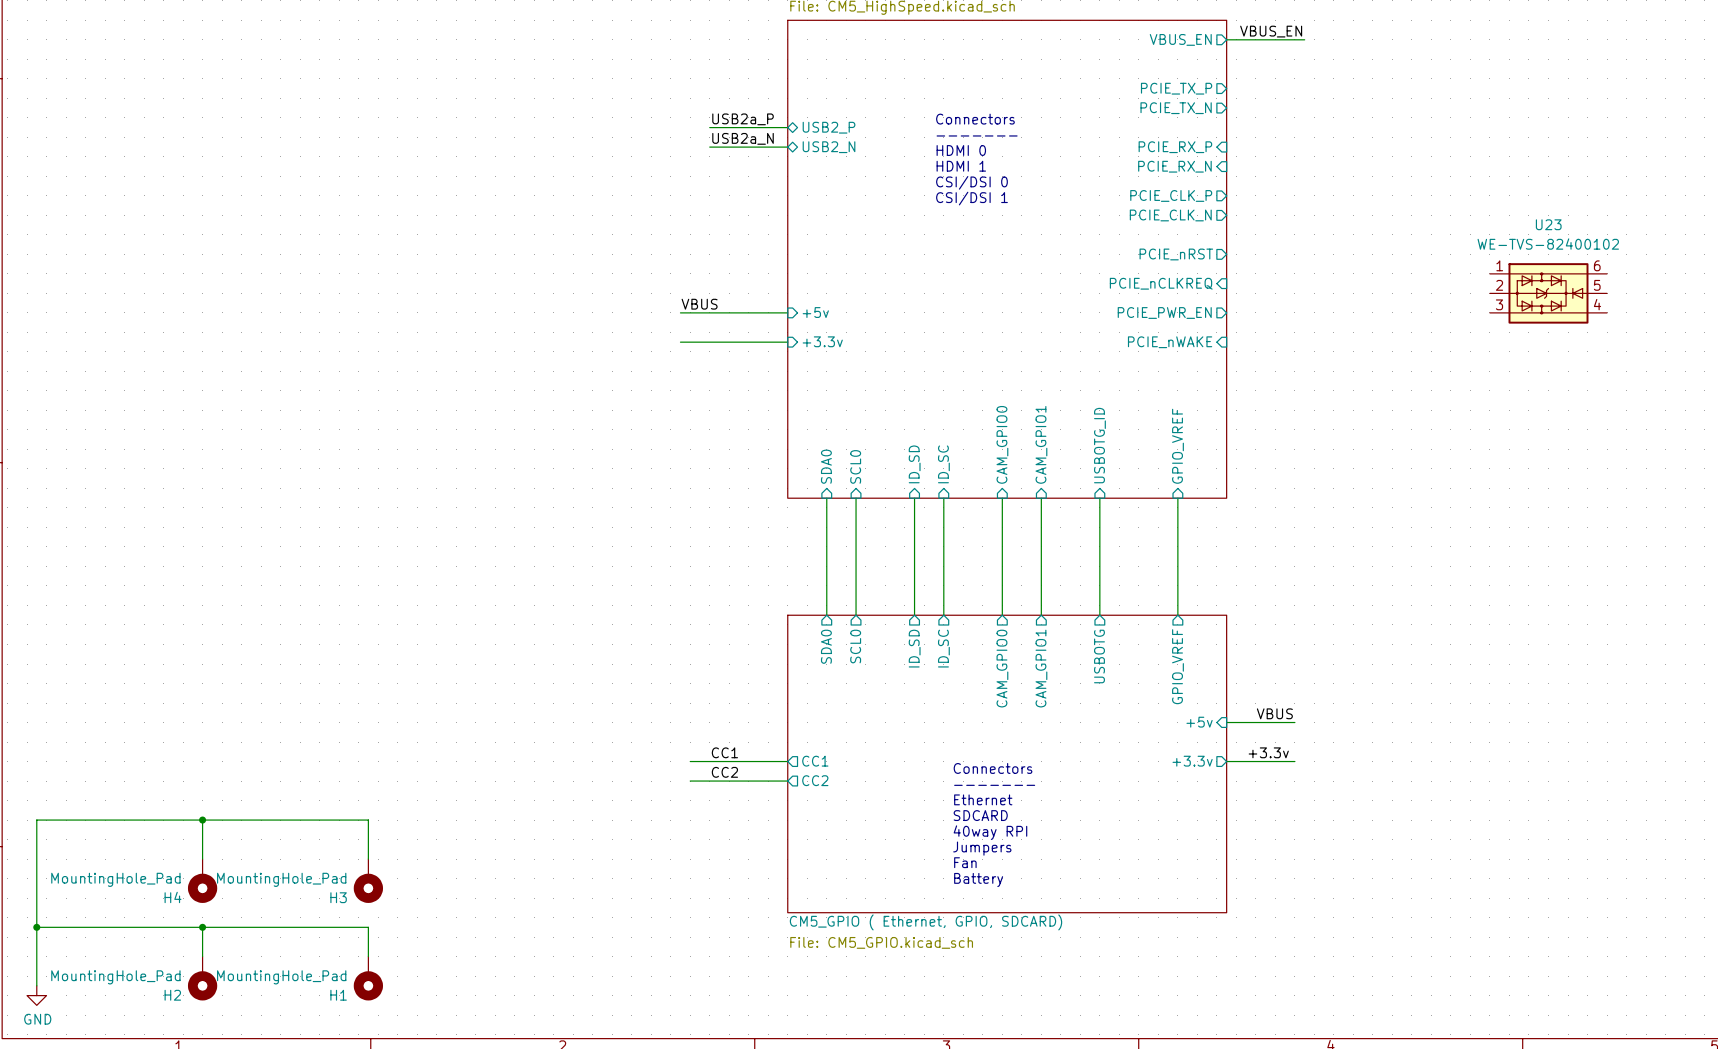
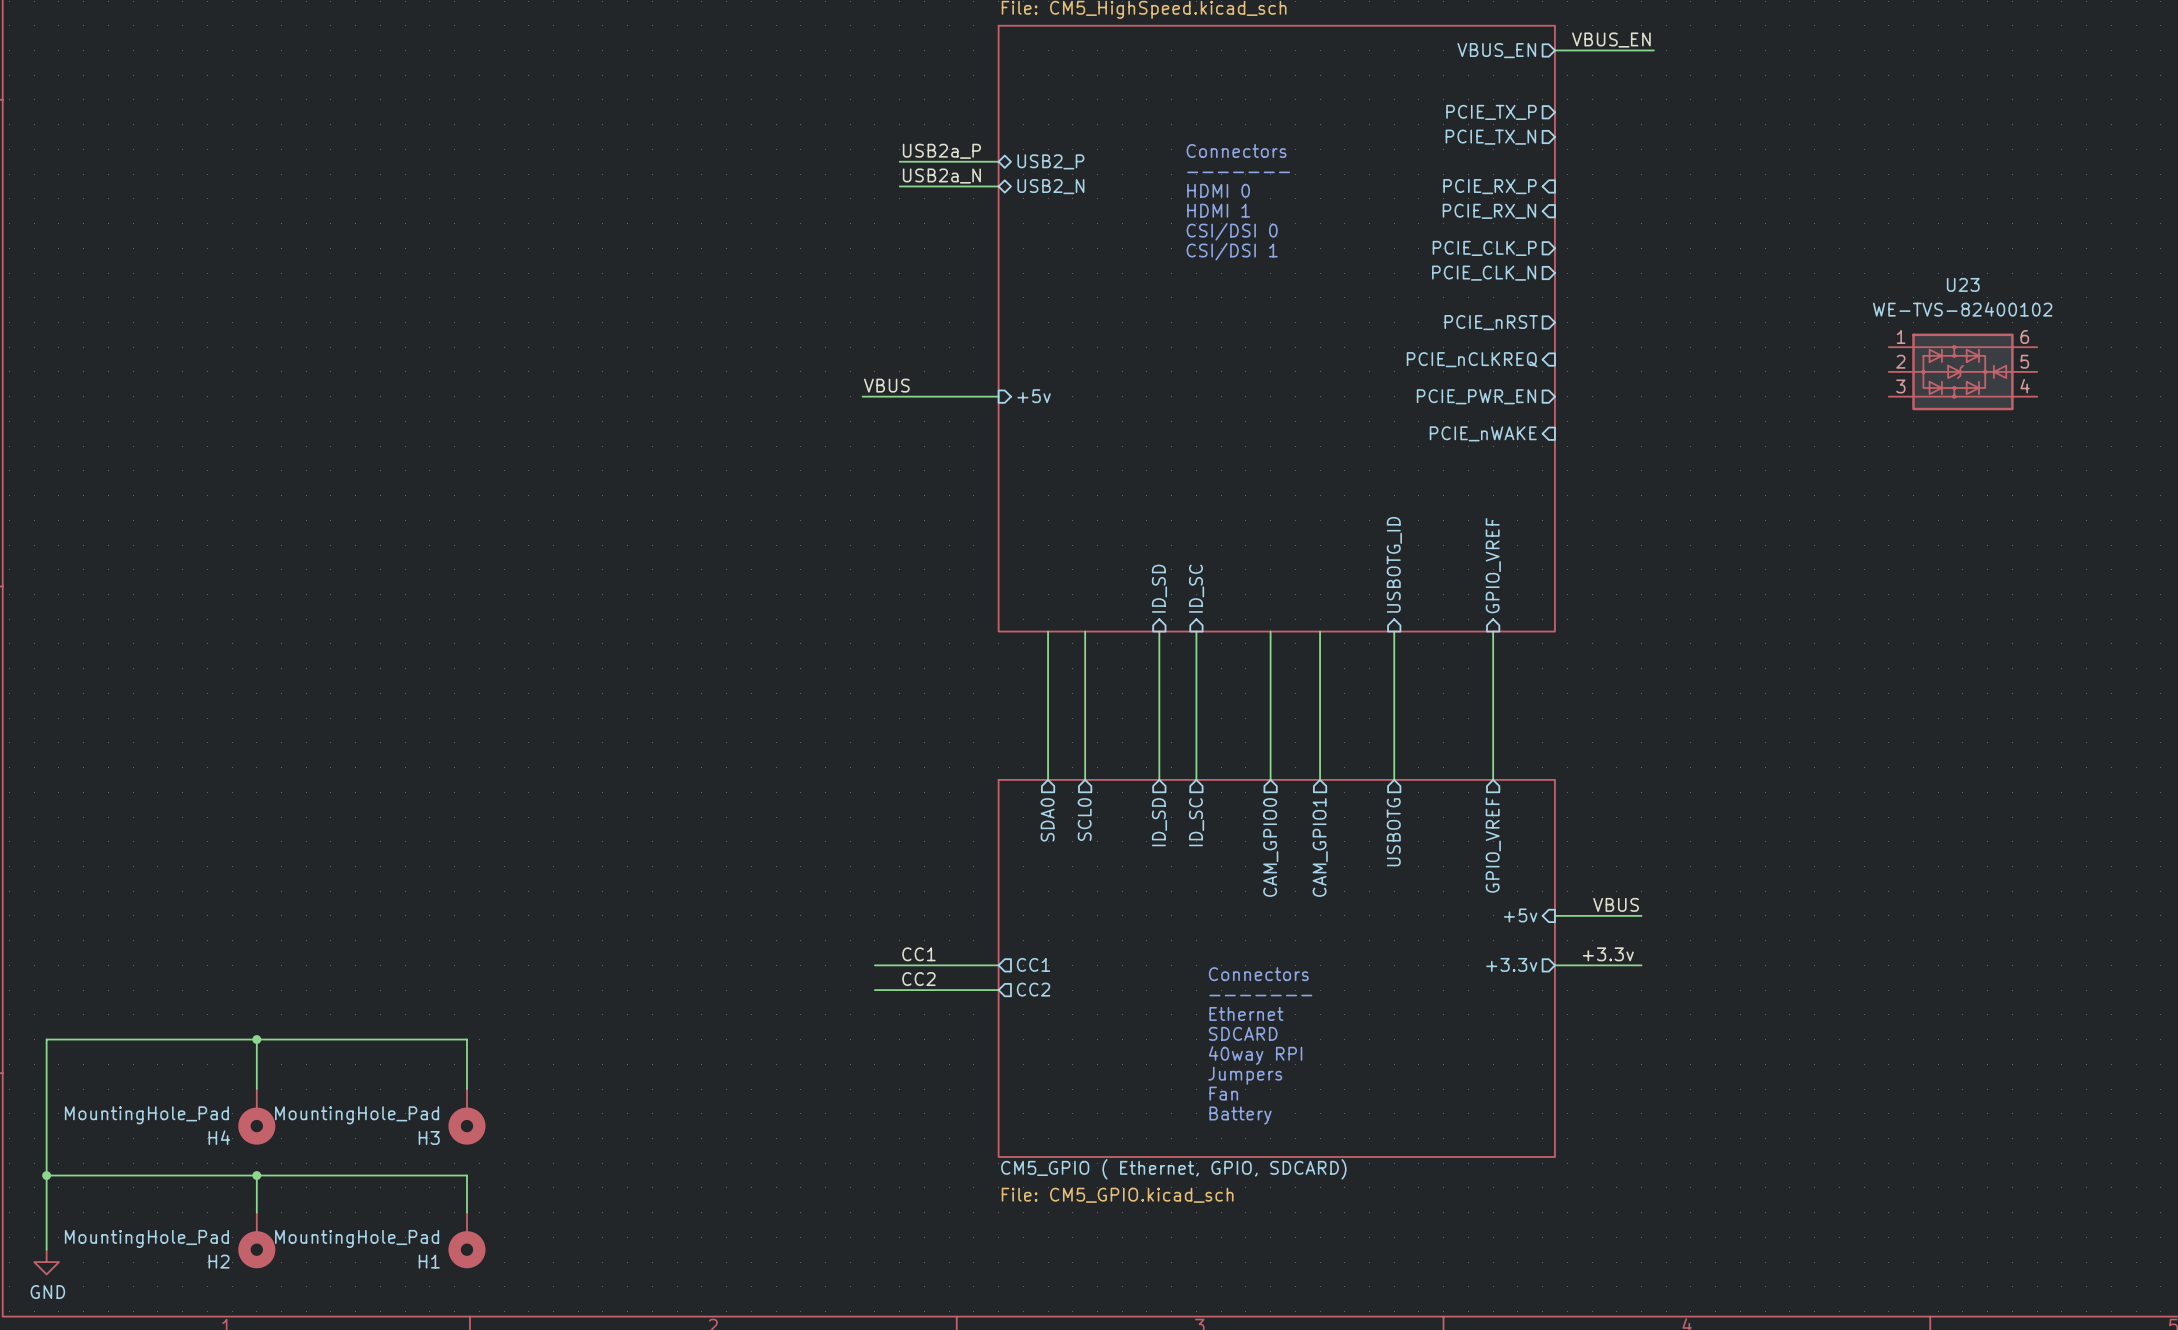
sheet pin: +3.3v (822, 341) -> none
wire: (680, 342) (787, 342) -> none
sheet pin: CAM_GPIO0 (1002, 444) -> none
sheet pin: CAM_GPIO1 (1041, 444) -> none
sheet pin: SDA0 (826, 466) -> none
sheet pin: SCL0 (855, 466) -> none

